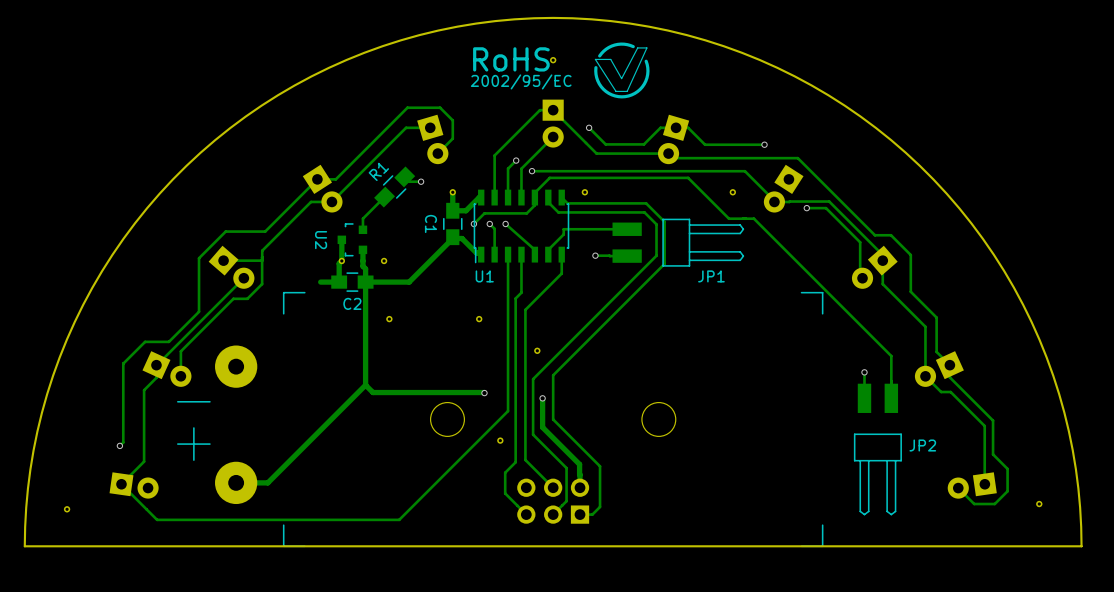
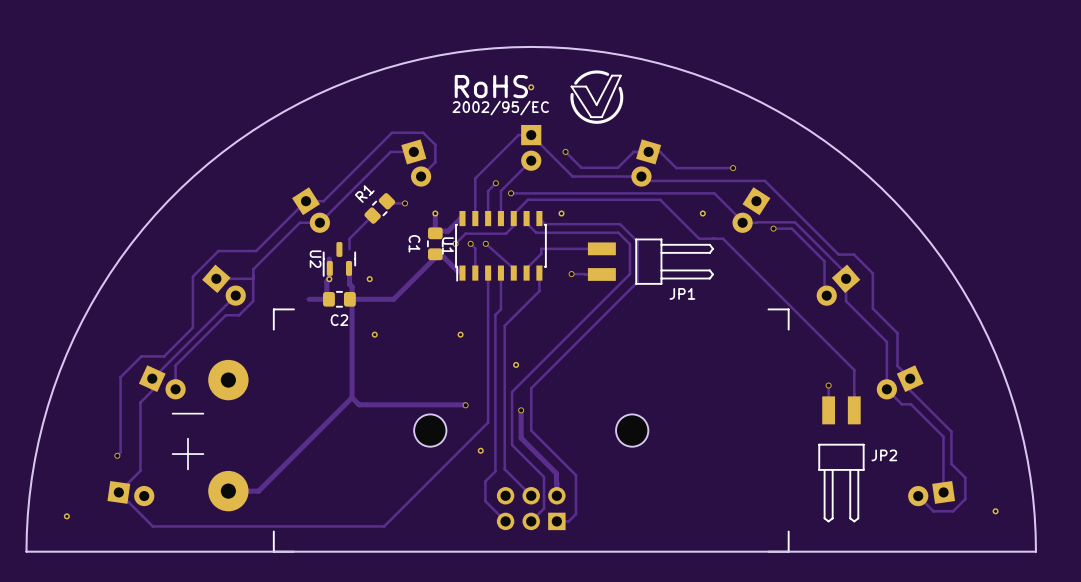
R1 footprint: [374, 166, 416, 208] -> [364, 193, 396, 224]
C1 footprint: [443, 202, 463, 246] -> [427, 227, 444, 261]
U2 footprint: [337, 223, 368, 257] -> [323, 242, 356, 277]
C2 footprint: [331, 272, 374, 292] -> [323, 291, 356, 308]
U1 name rotation: 0° (484, 276) -> 90° clockwise (448, 246)
U1 name position: U1 (484, 276) -> U1 (448, 246)

